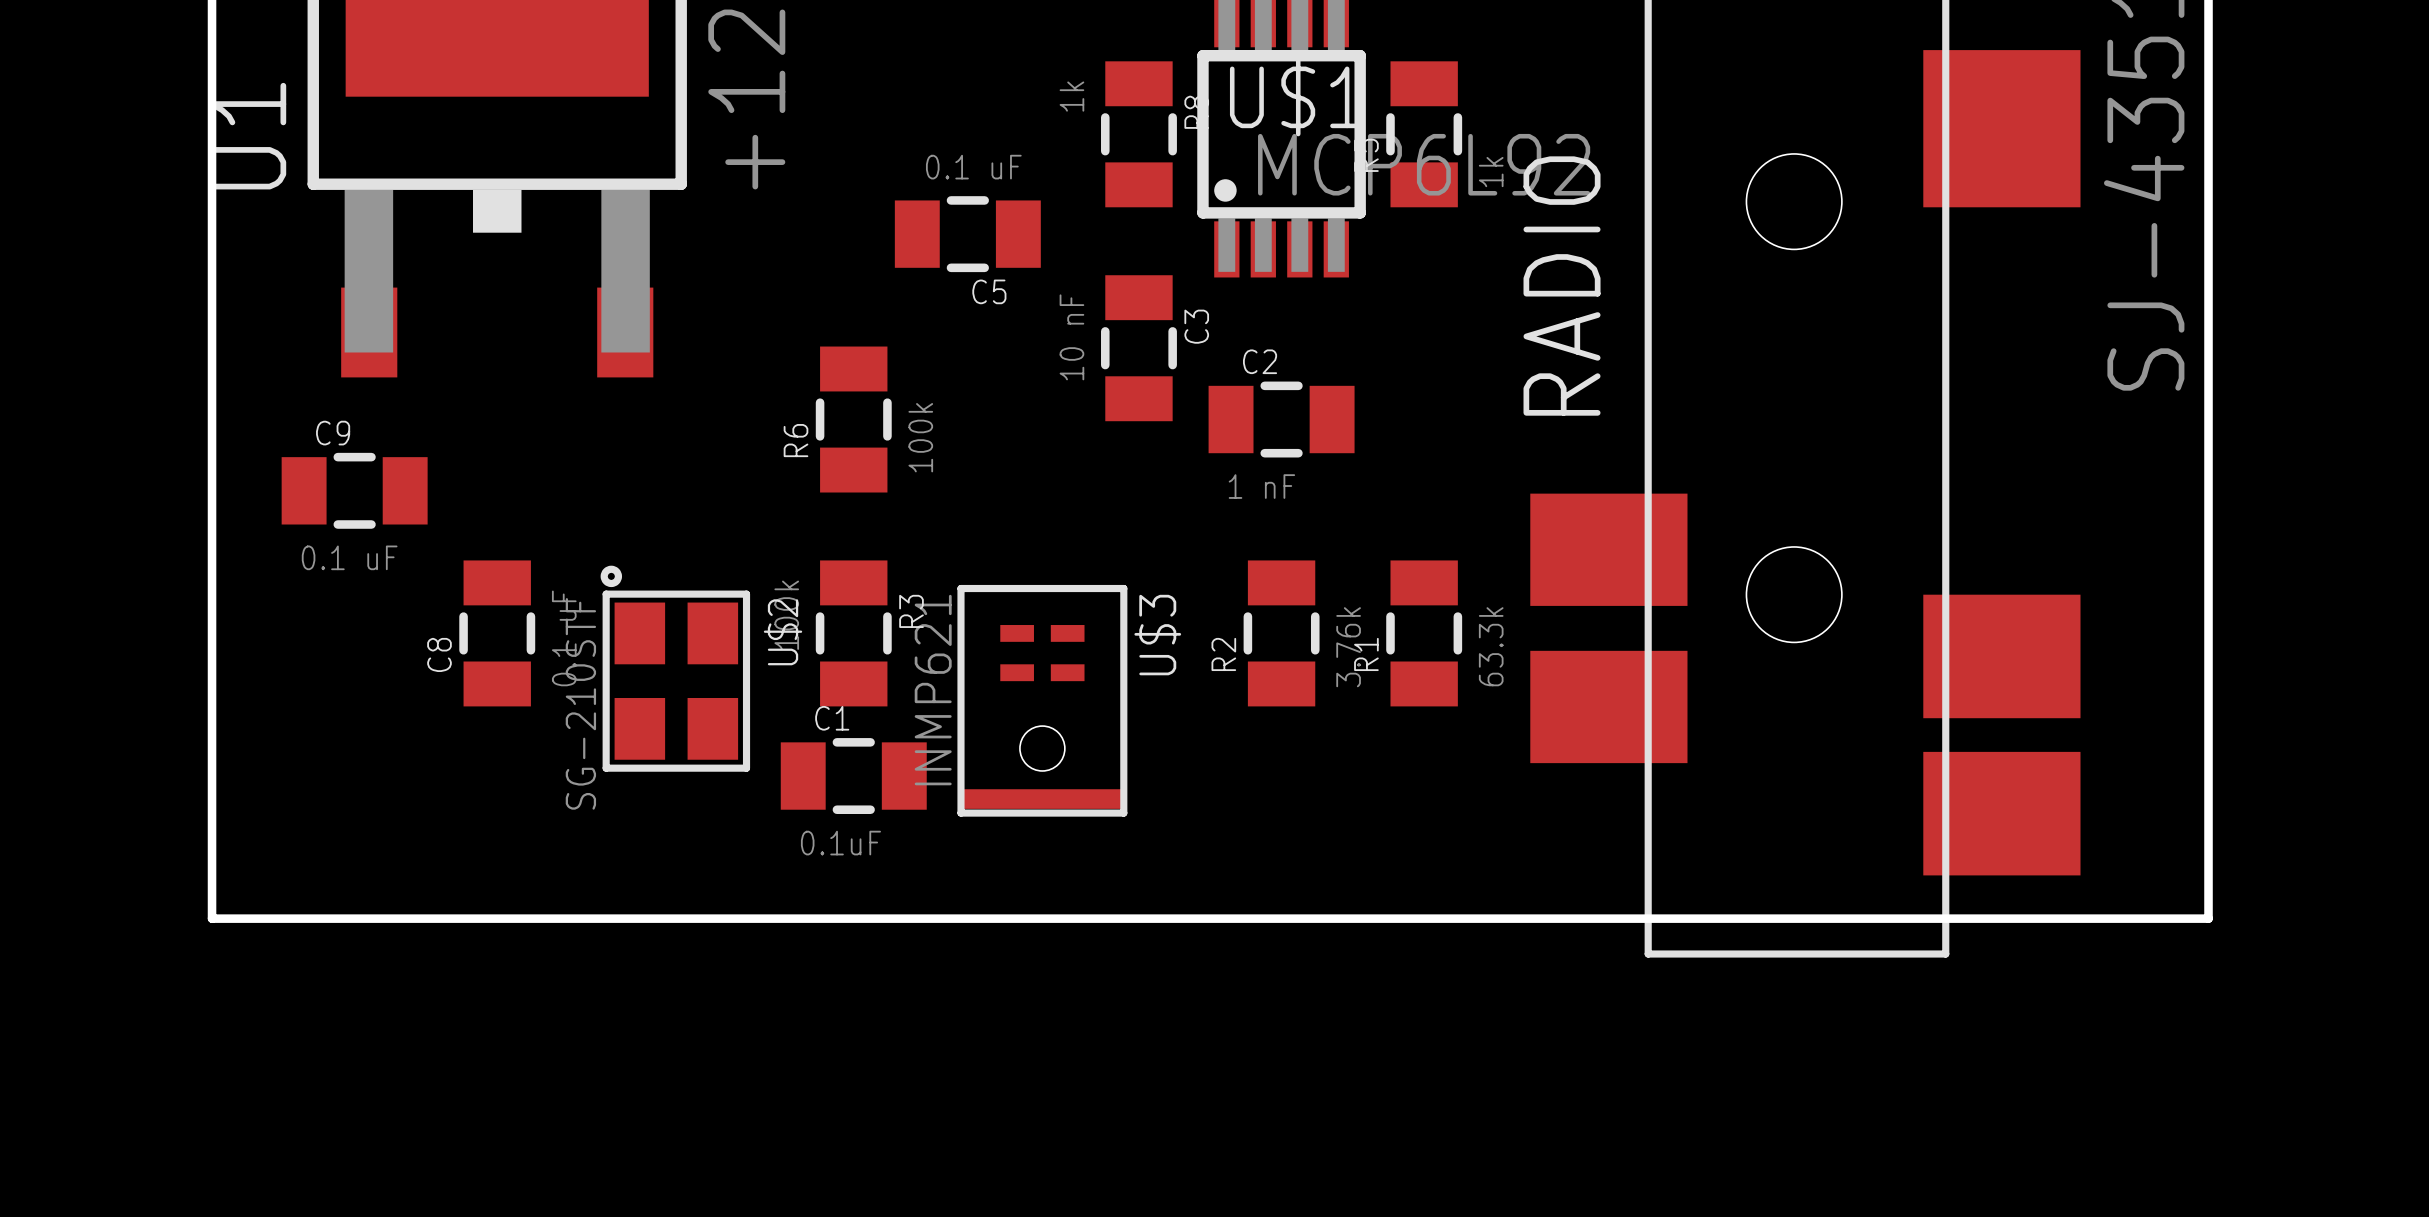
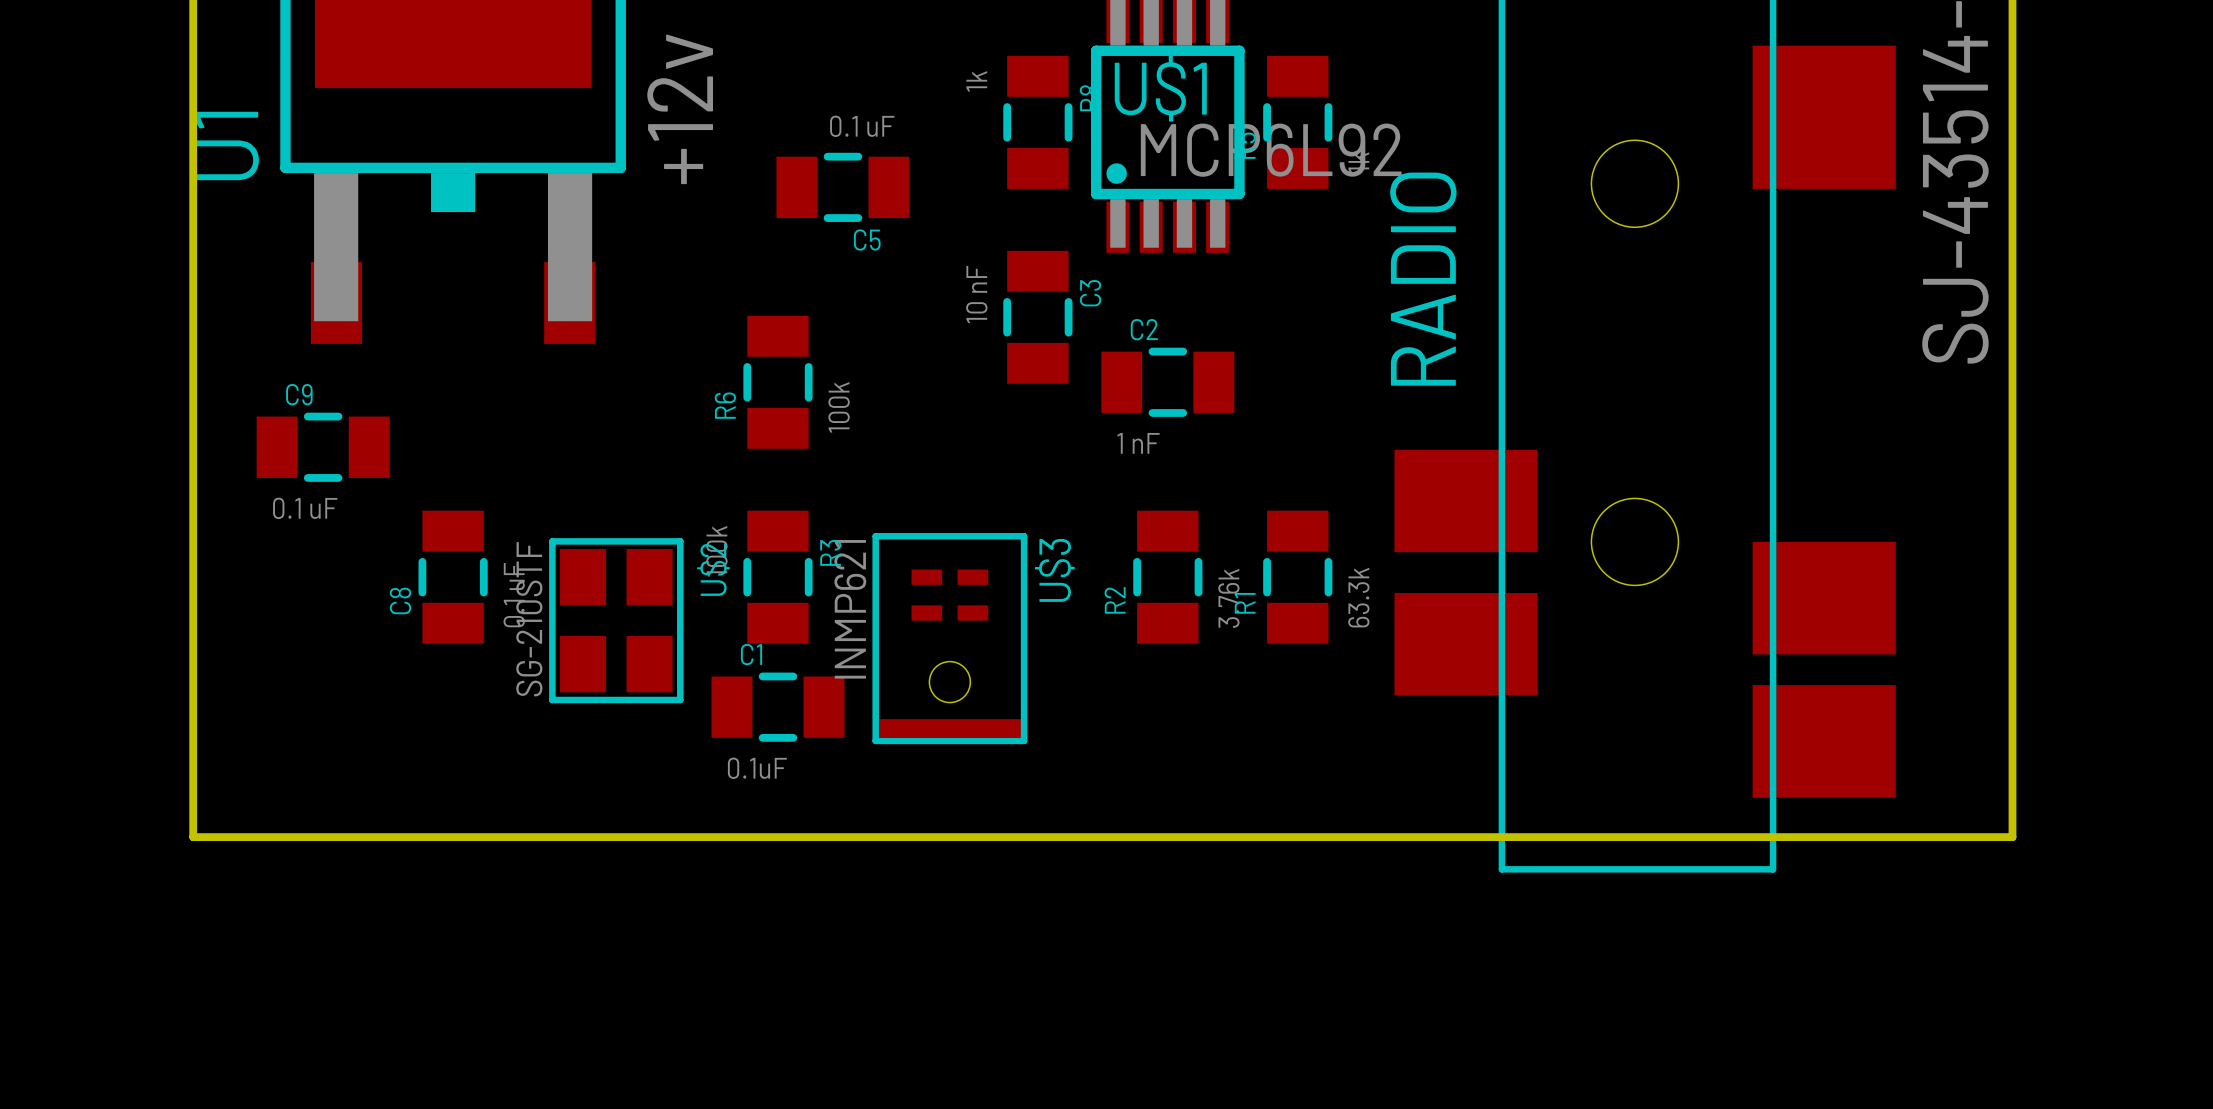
C5 position: (967, 234) -> (842, 187)
U$2 footprint: [600, 565, 751, 772] -> [549, 538, 684, 704]

